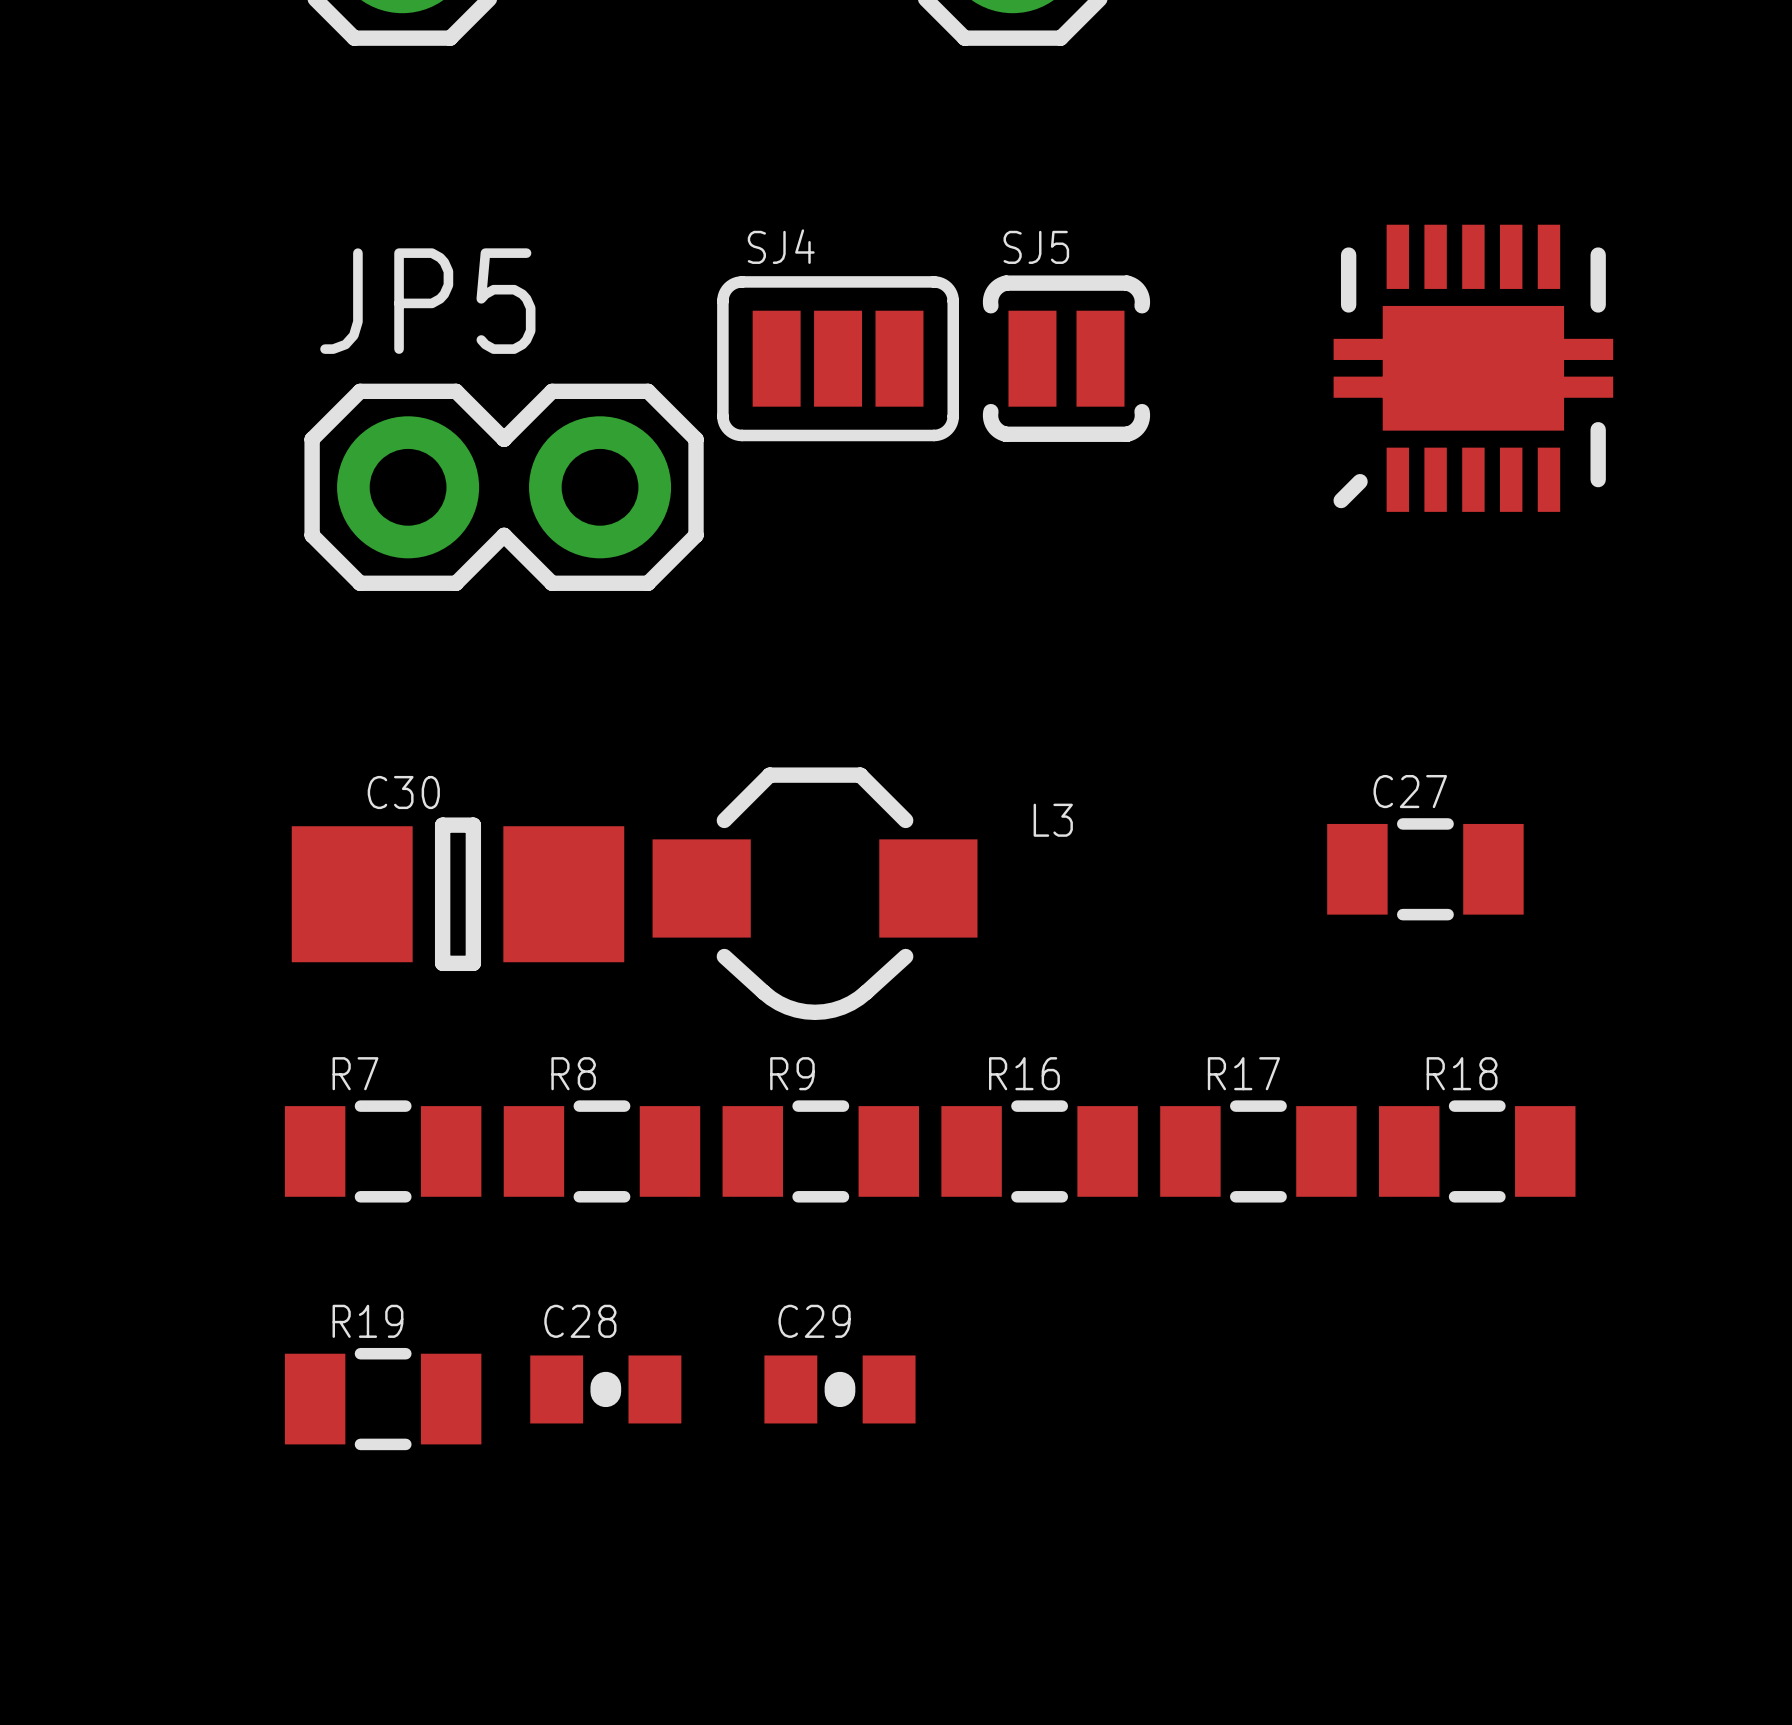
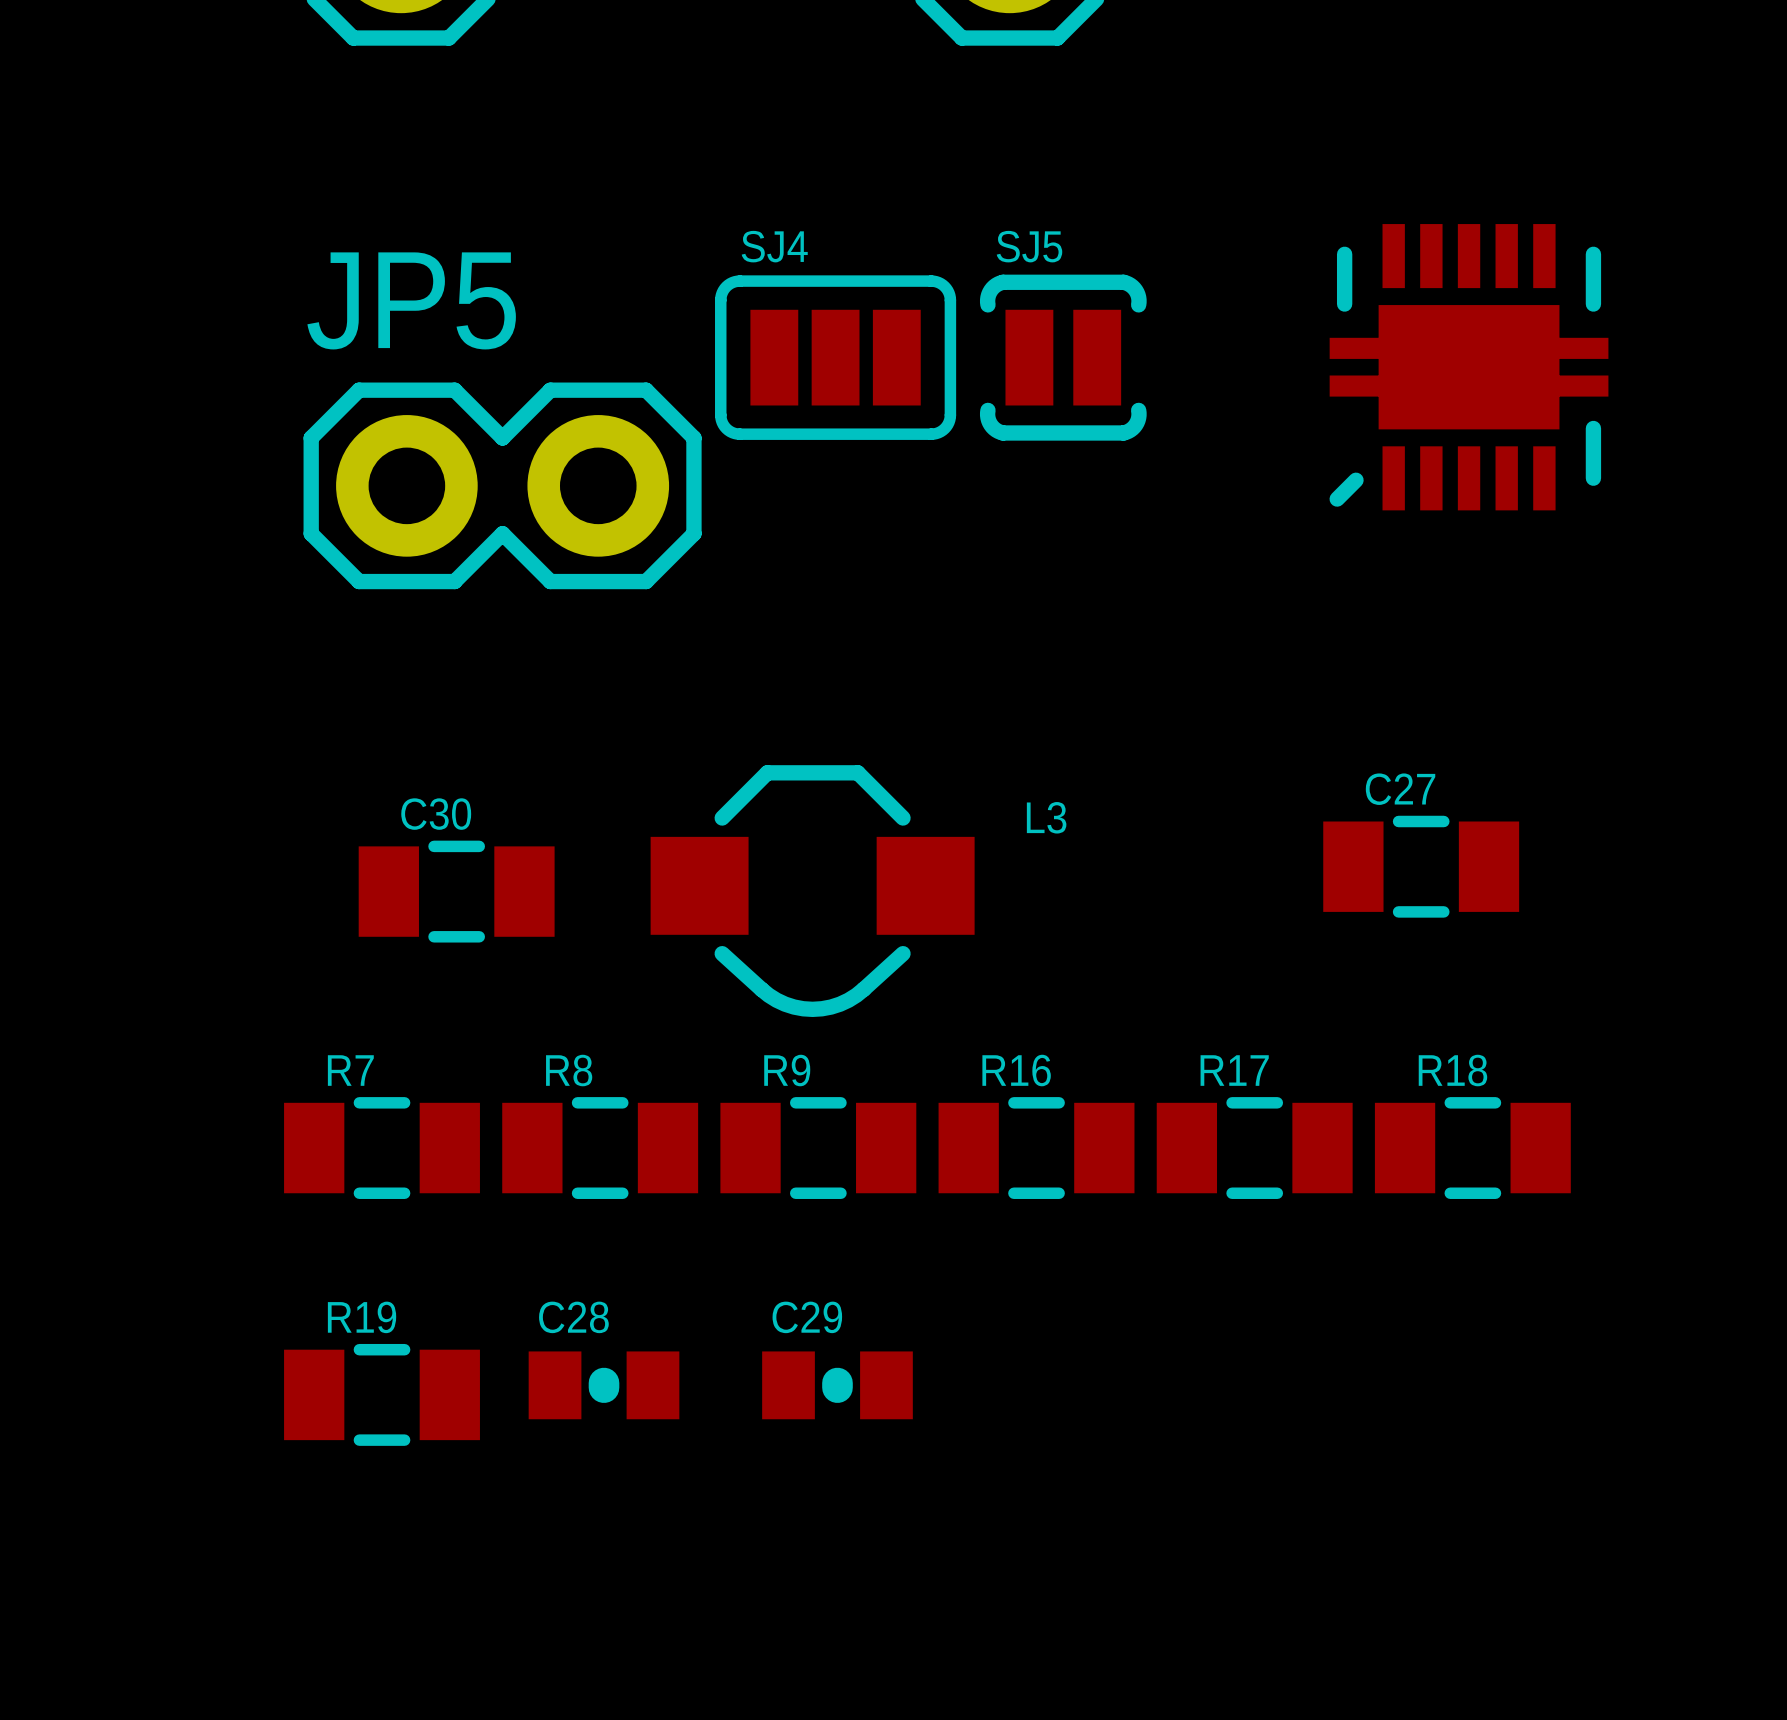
C30 name position: C30 (403, 792) -> C30 (436, 814)
C30 footprint: [291, 817, 625, 972] -> [358, 840, 555, 943]

